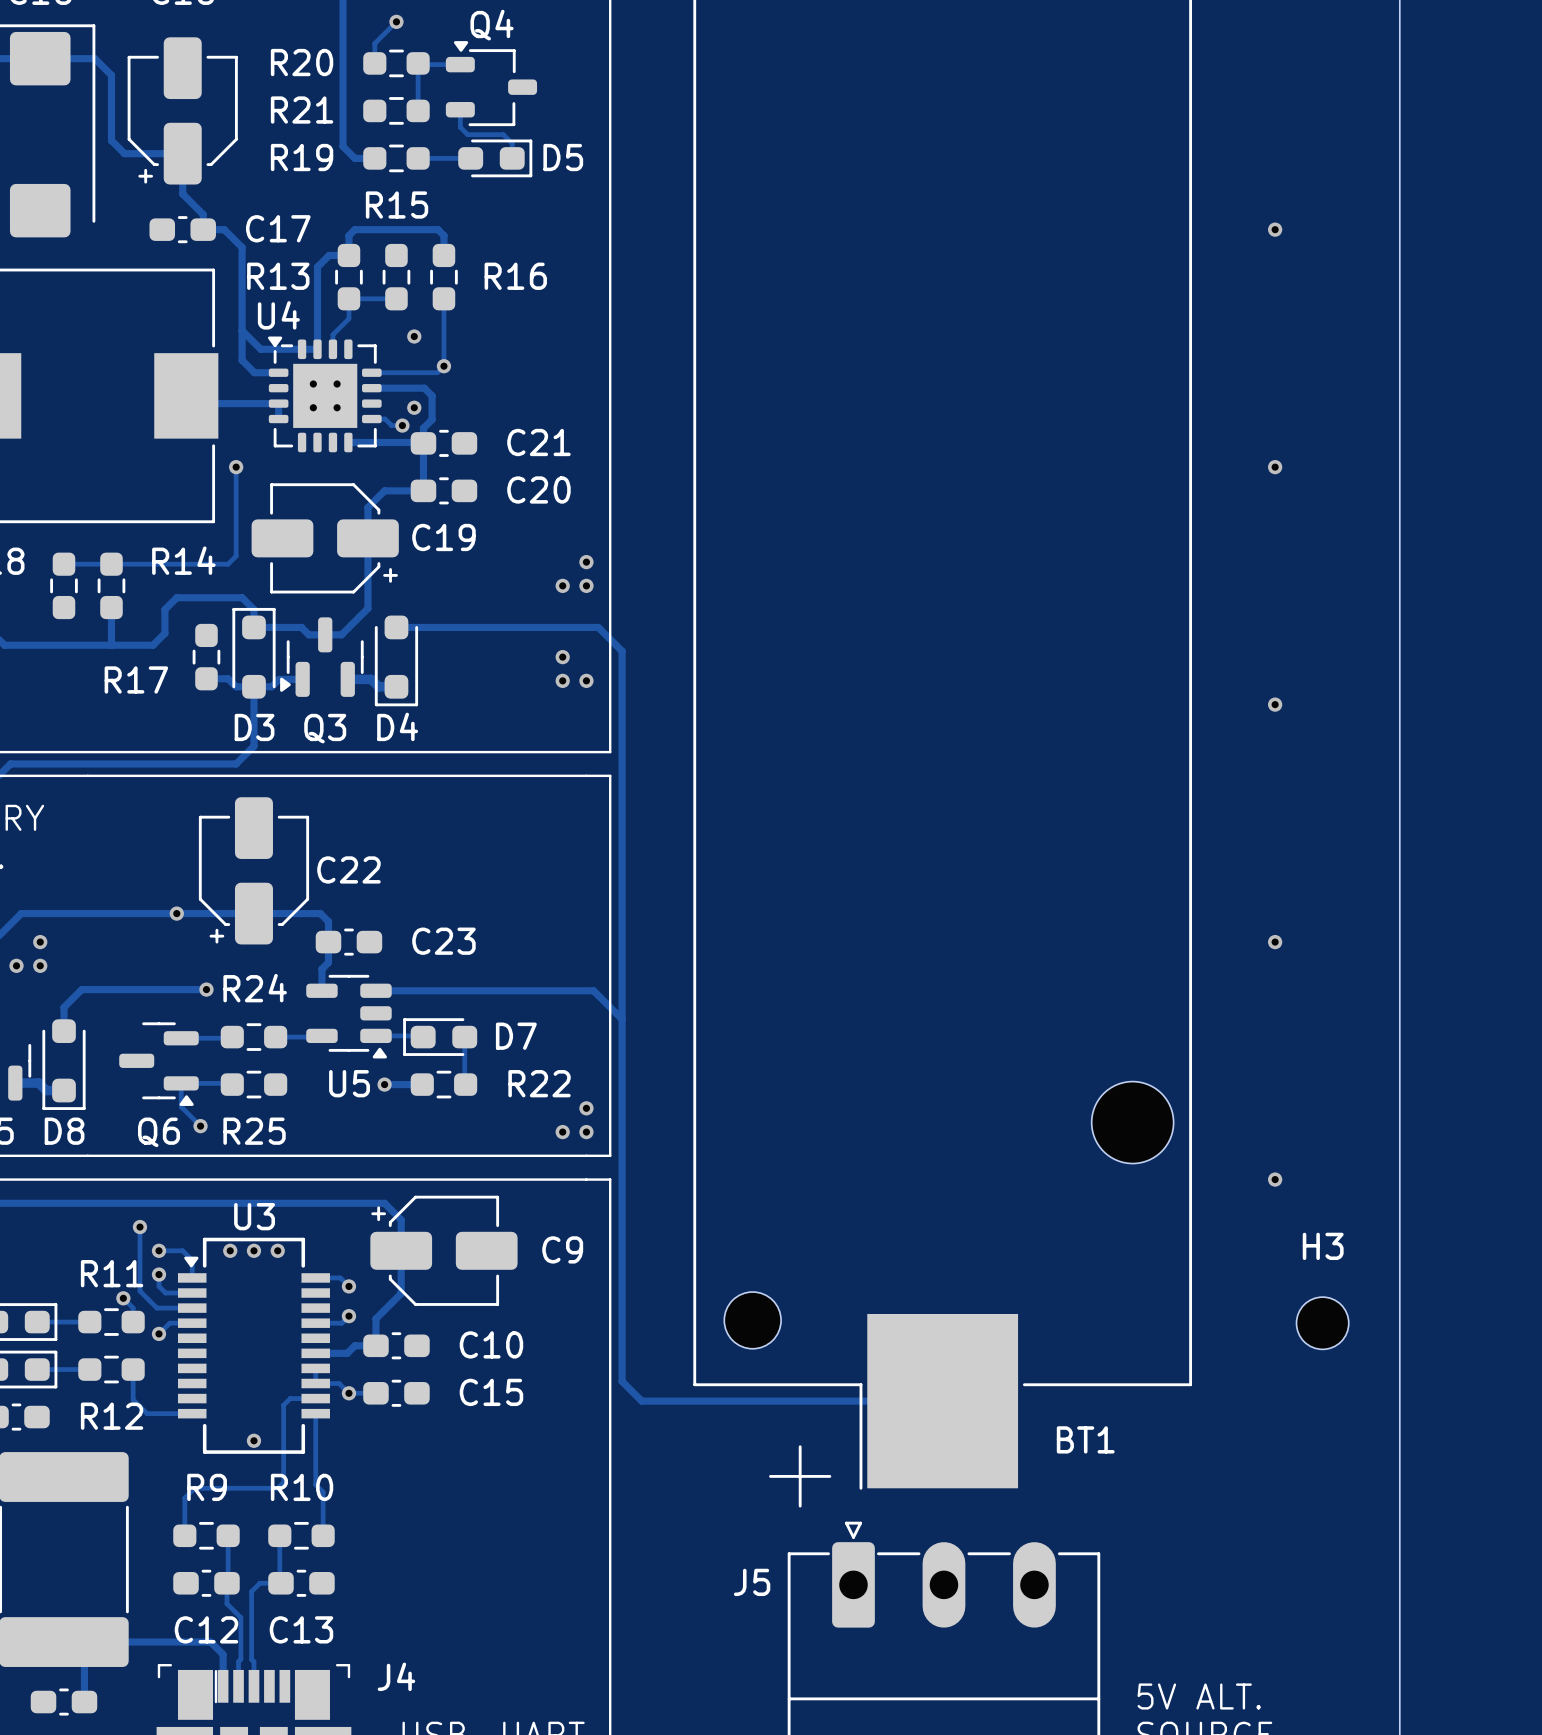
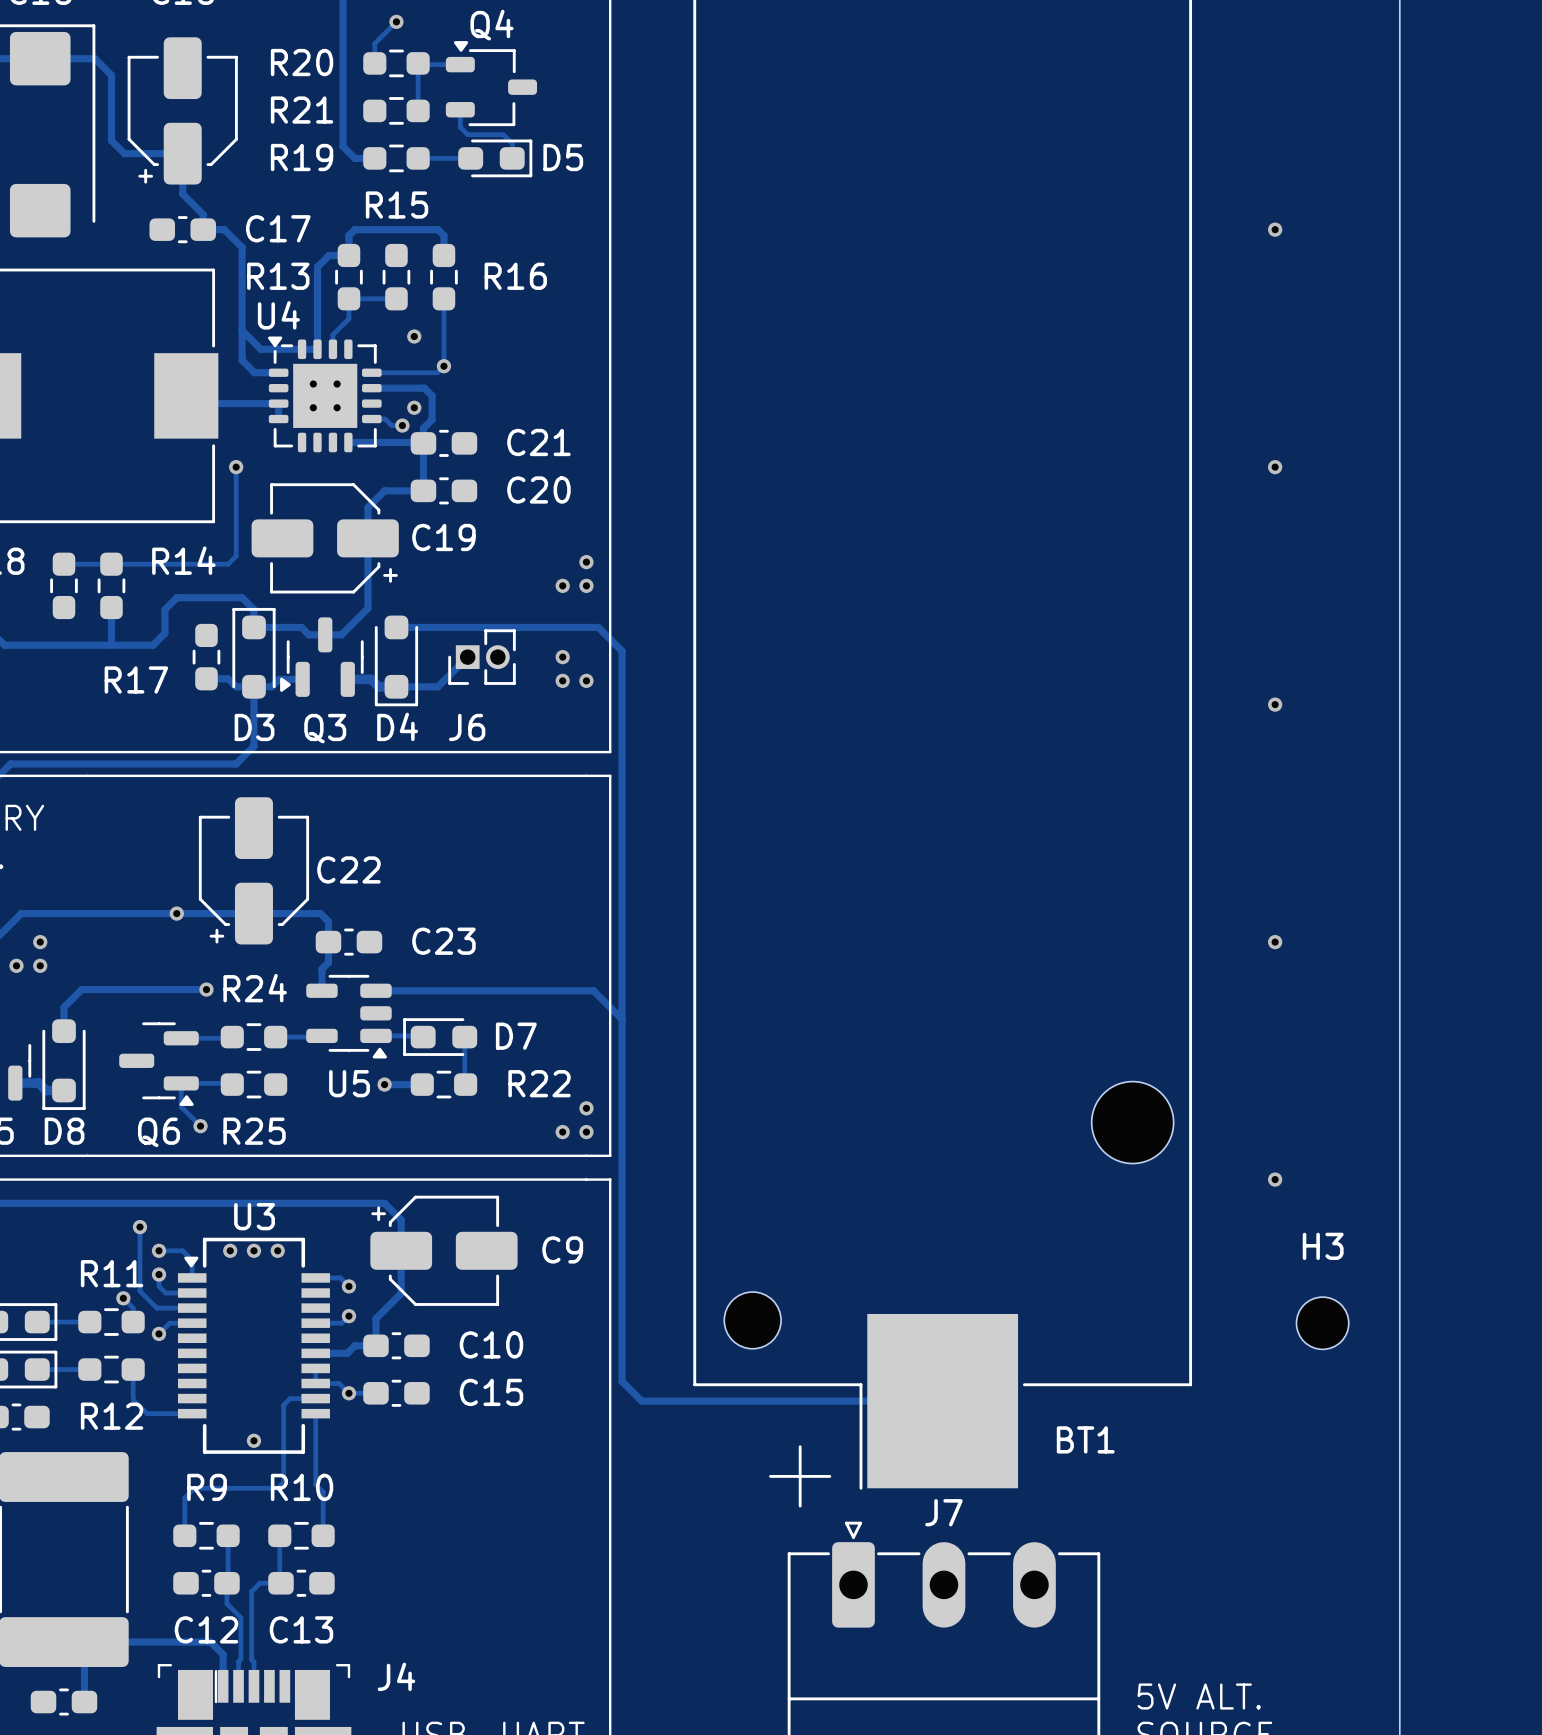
track: none -> (467, 657) (438, 686) (396, 686)
J6: none -> (482, 657)
J5 name: J5 (752, 1582) -> J7 (943, 1512)

